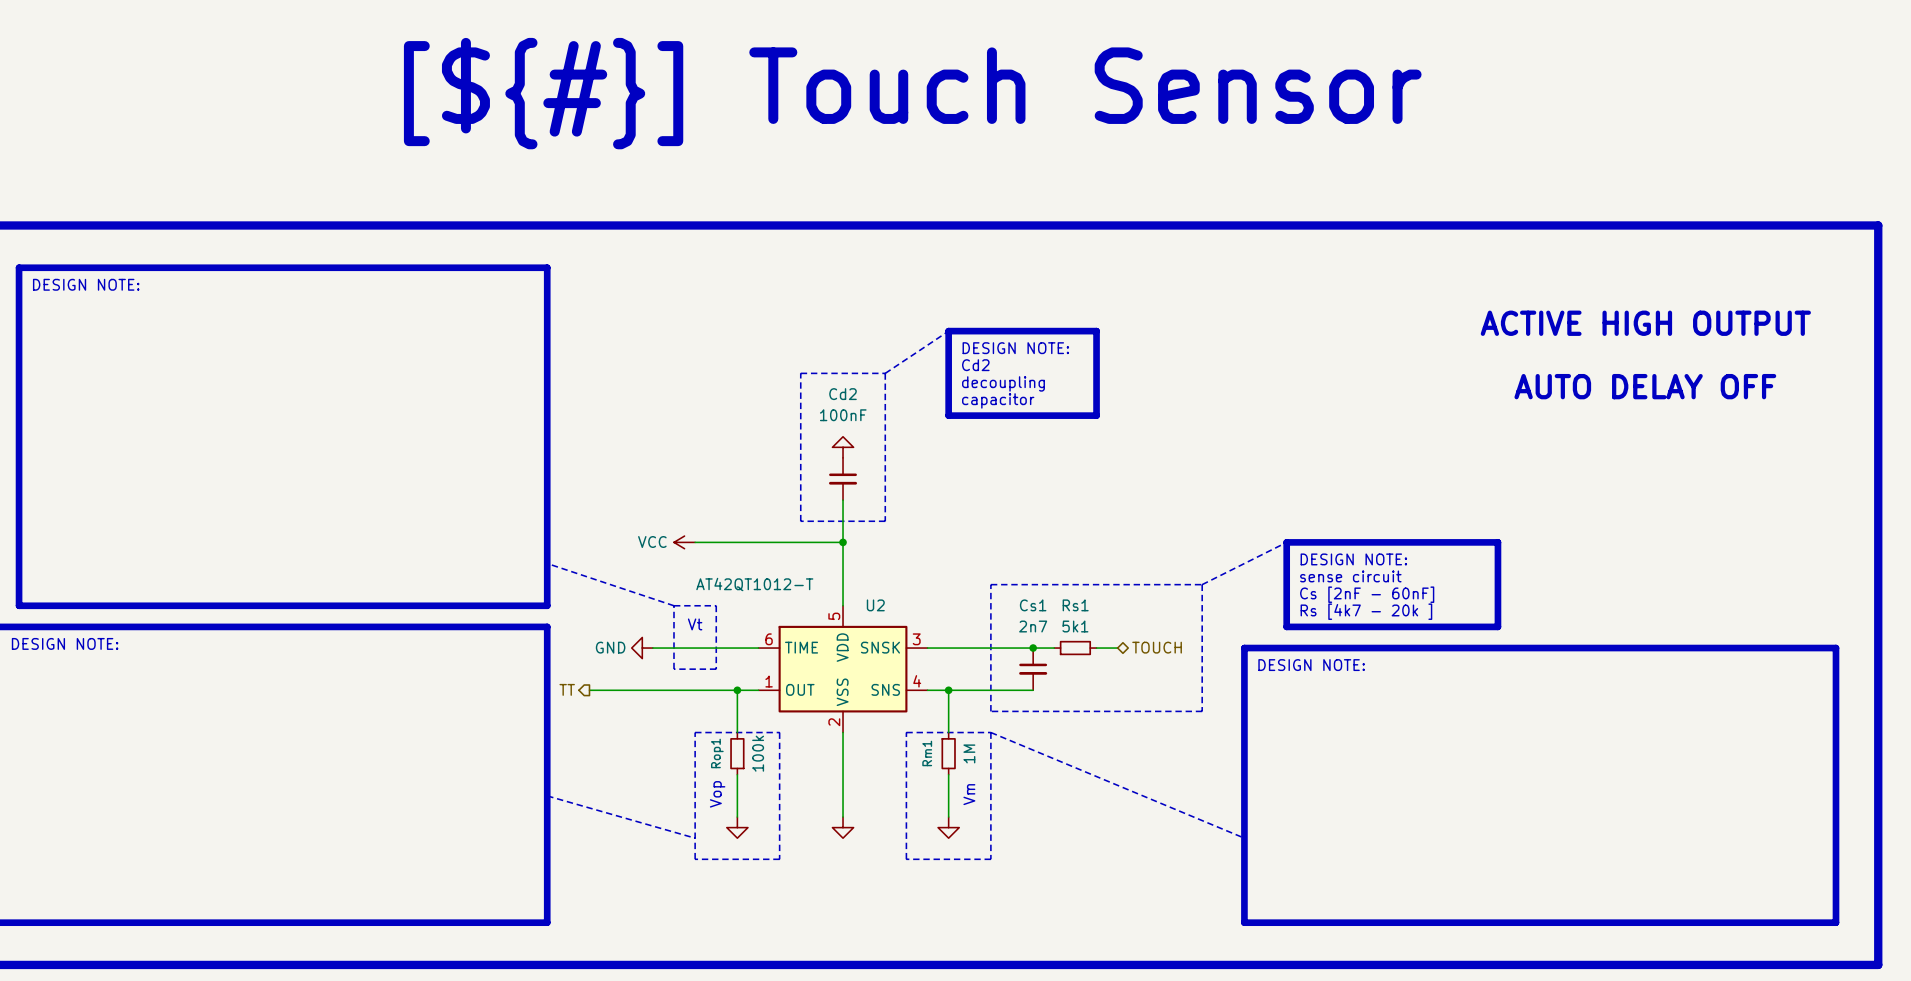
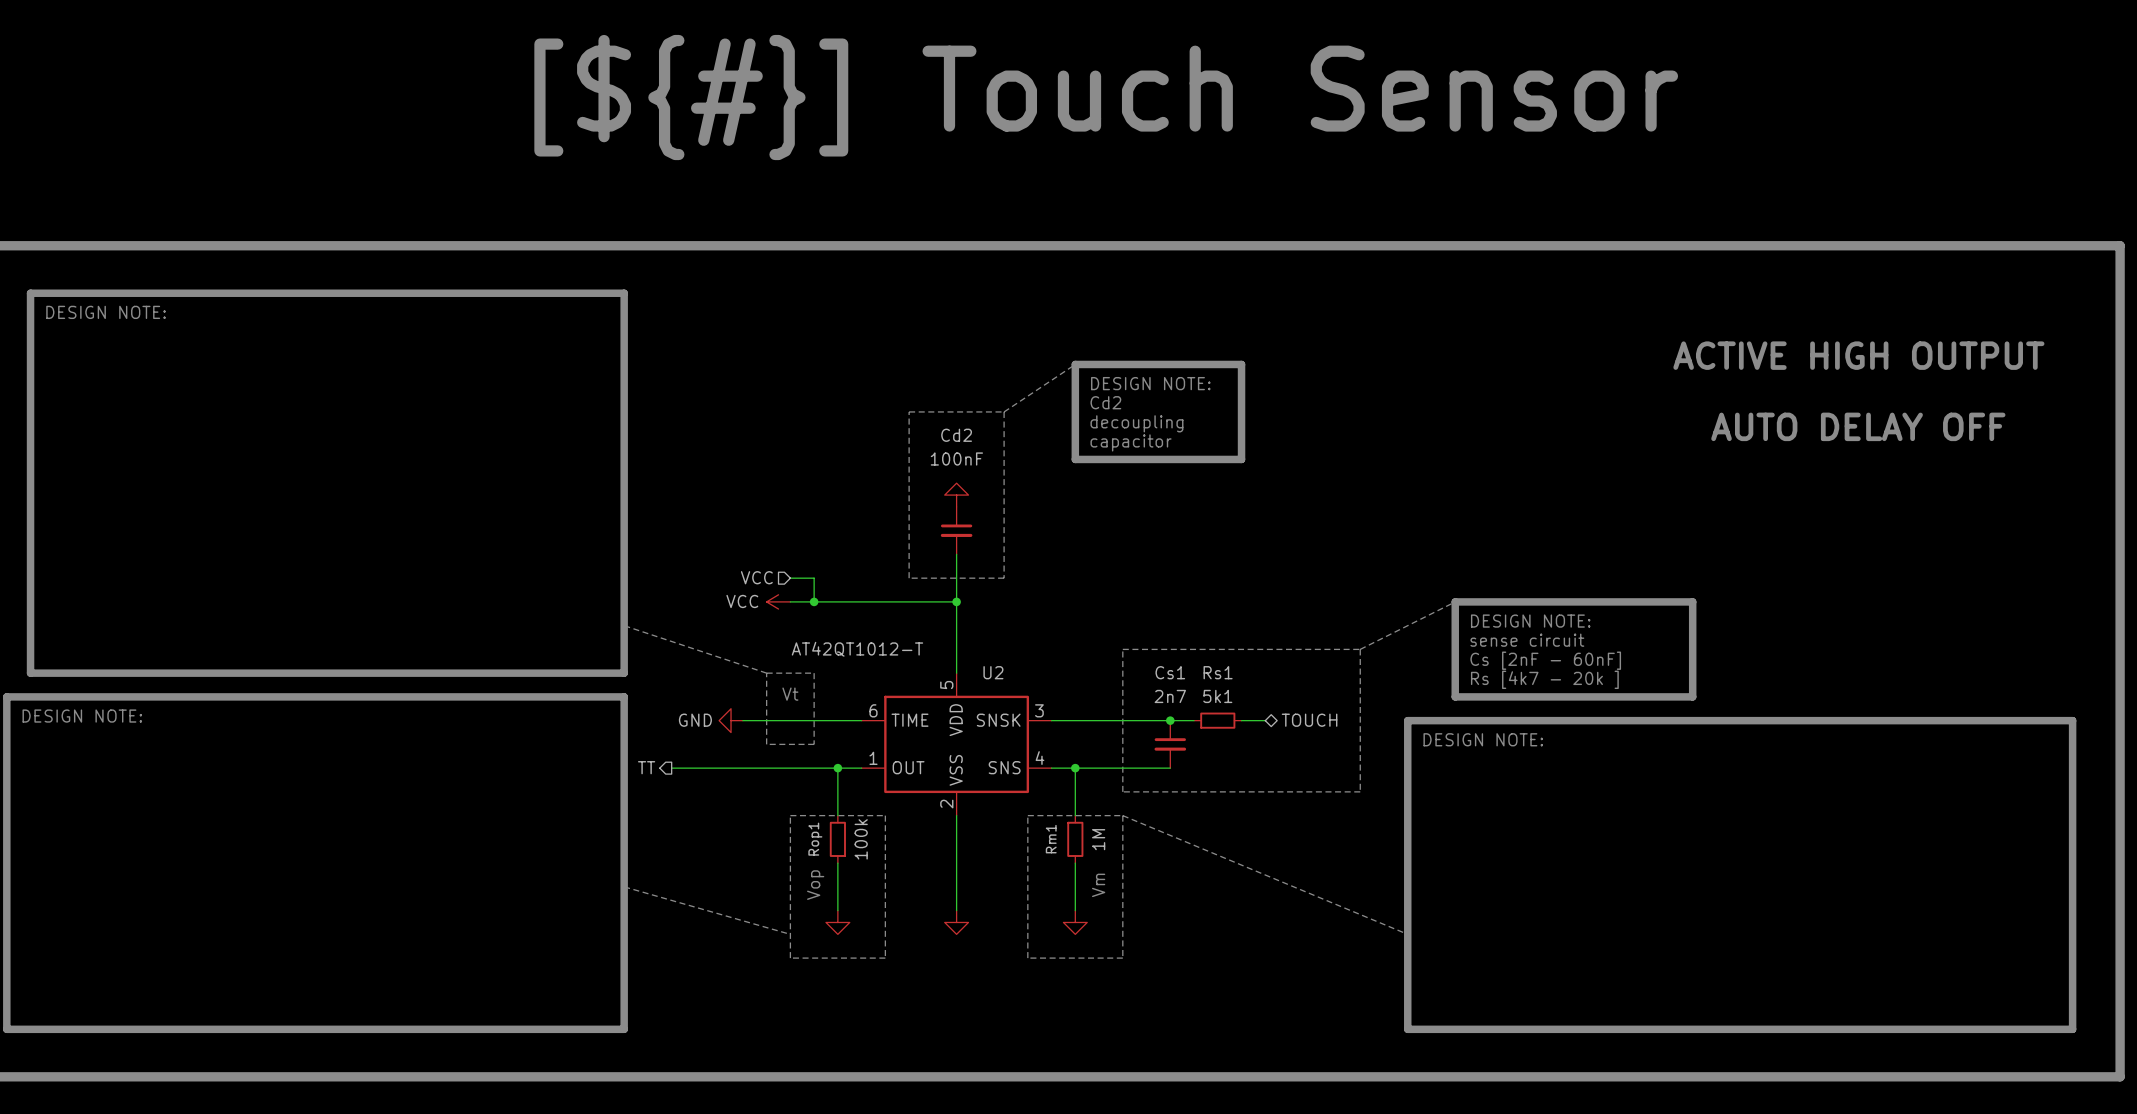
text position: [${#}] Touch Sensor (912, 93) -> [${#}] Touch Sensor (1106, 97)
hierarchical label: none -> VCC (756, 577)
wire: none -> (790, 578) (814, 578) (814, 601)
junction: none -> (814, 601)

